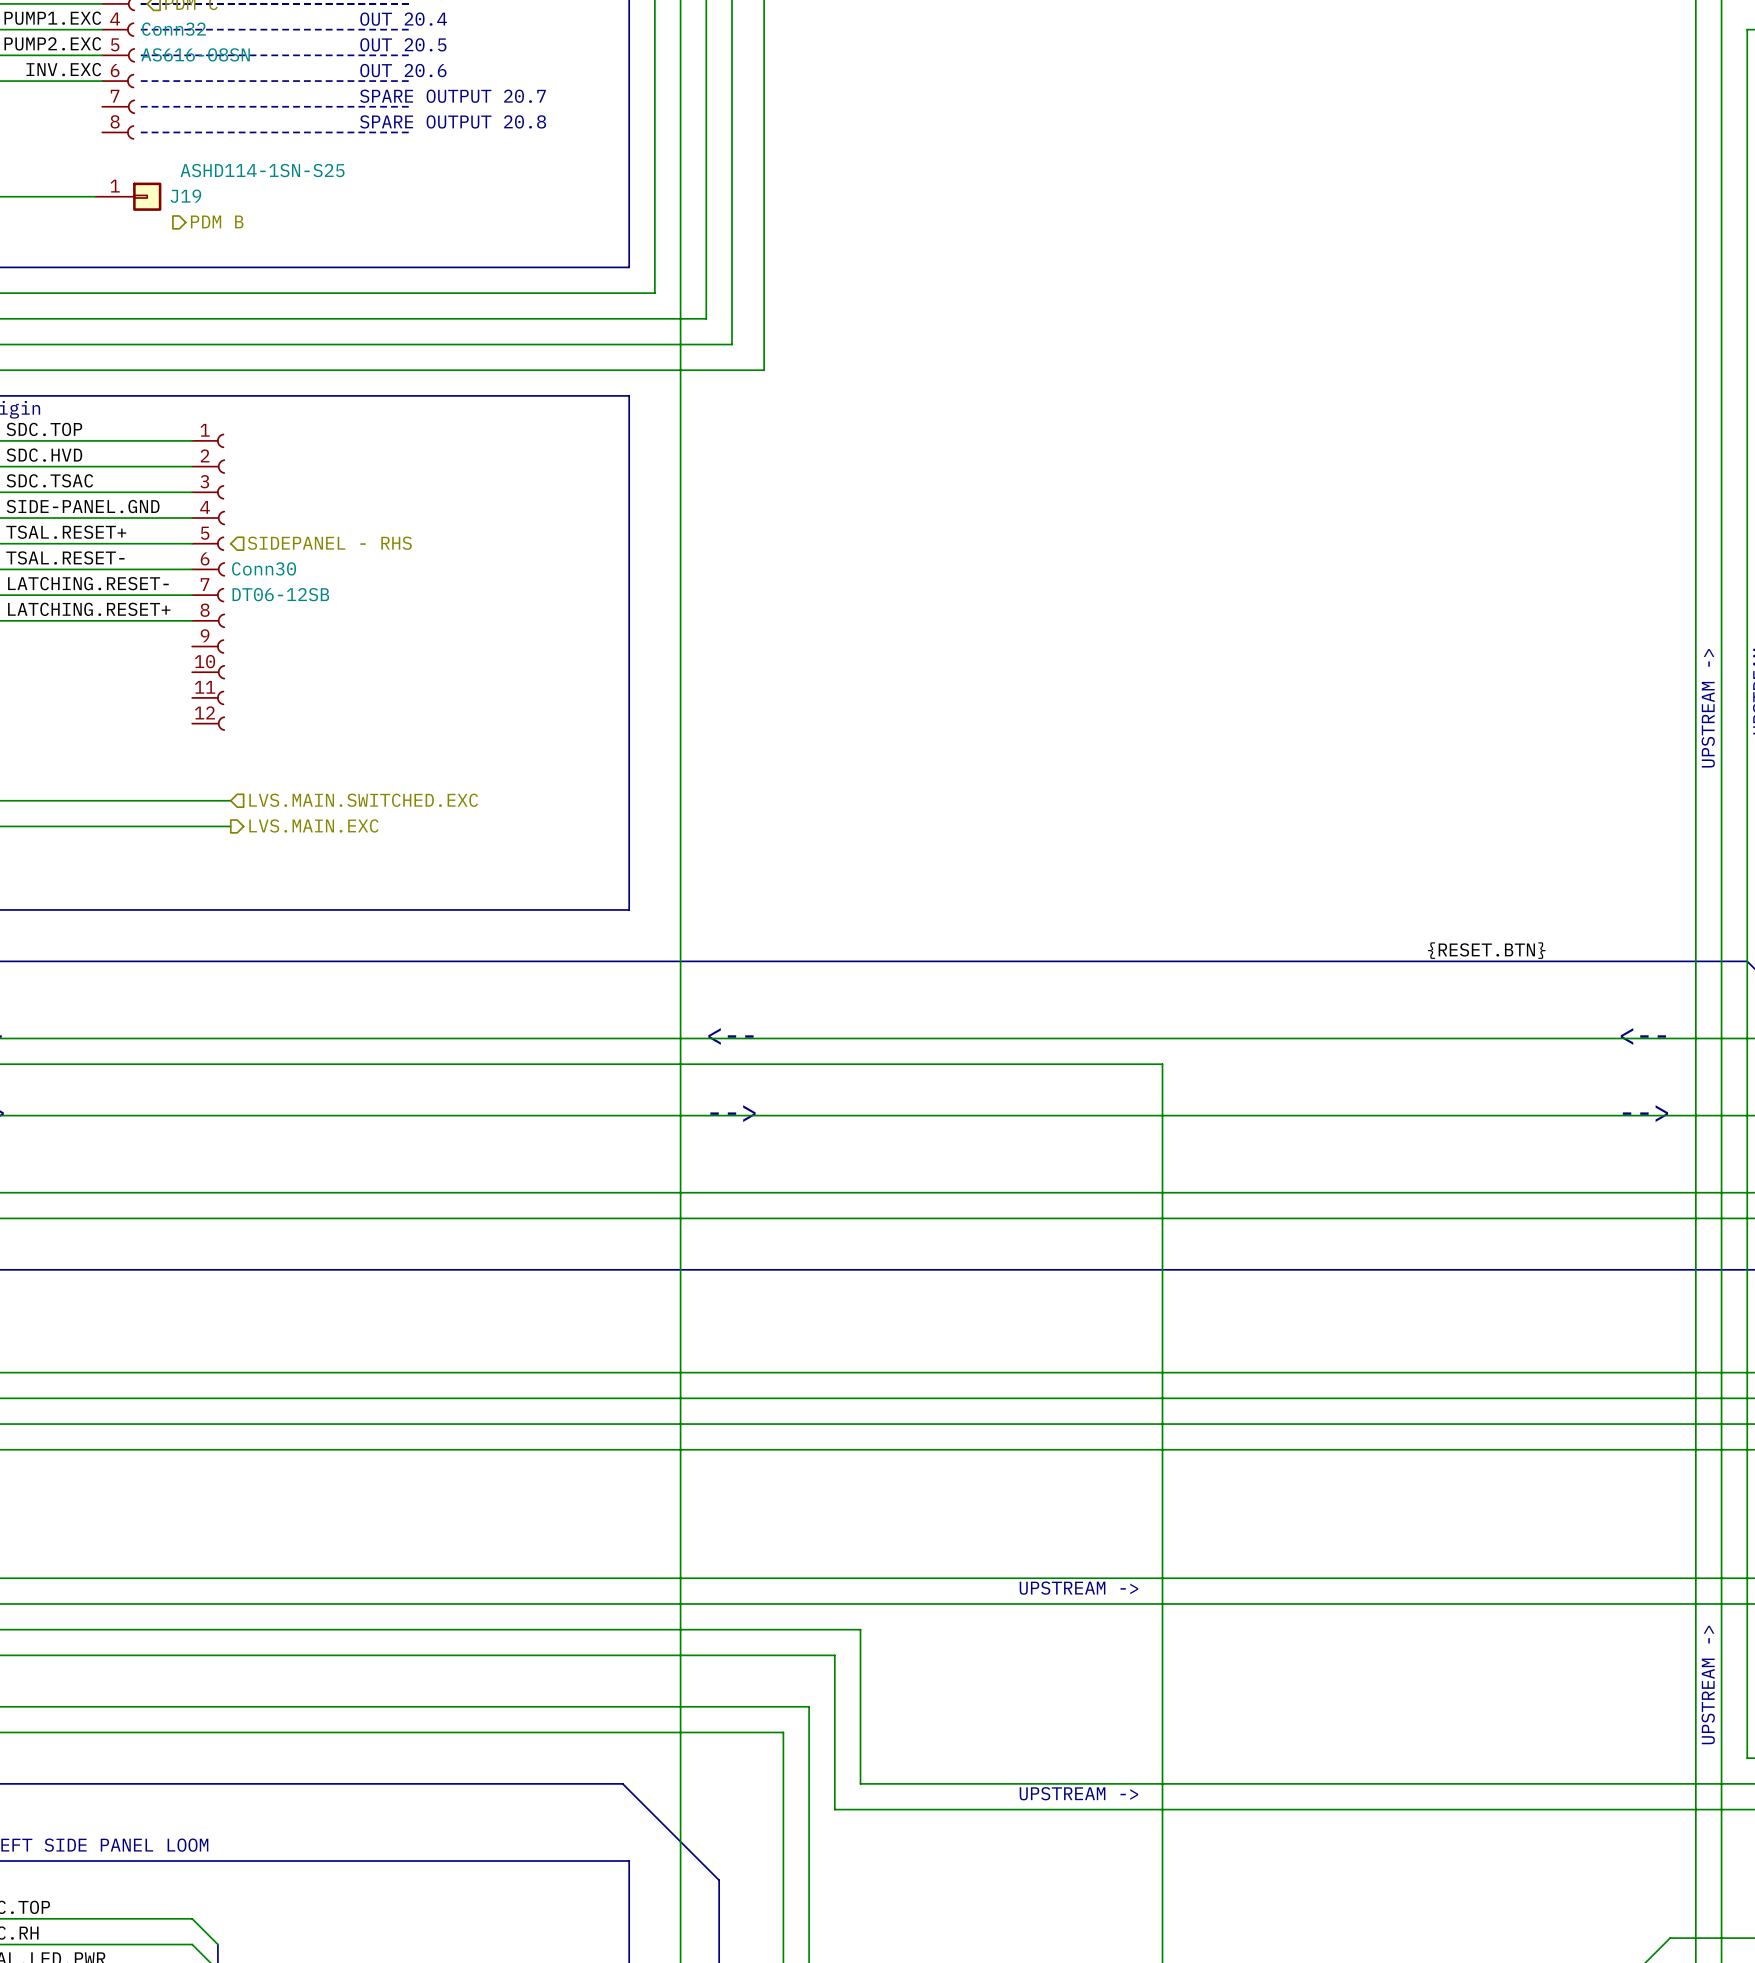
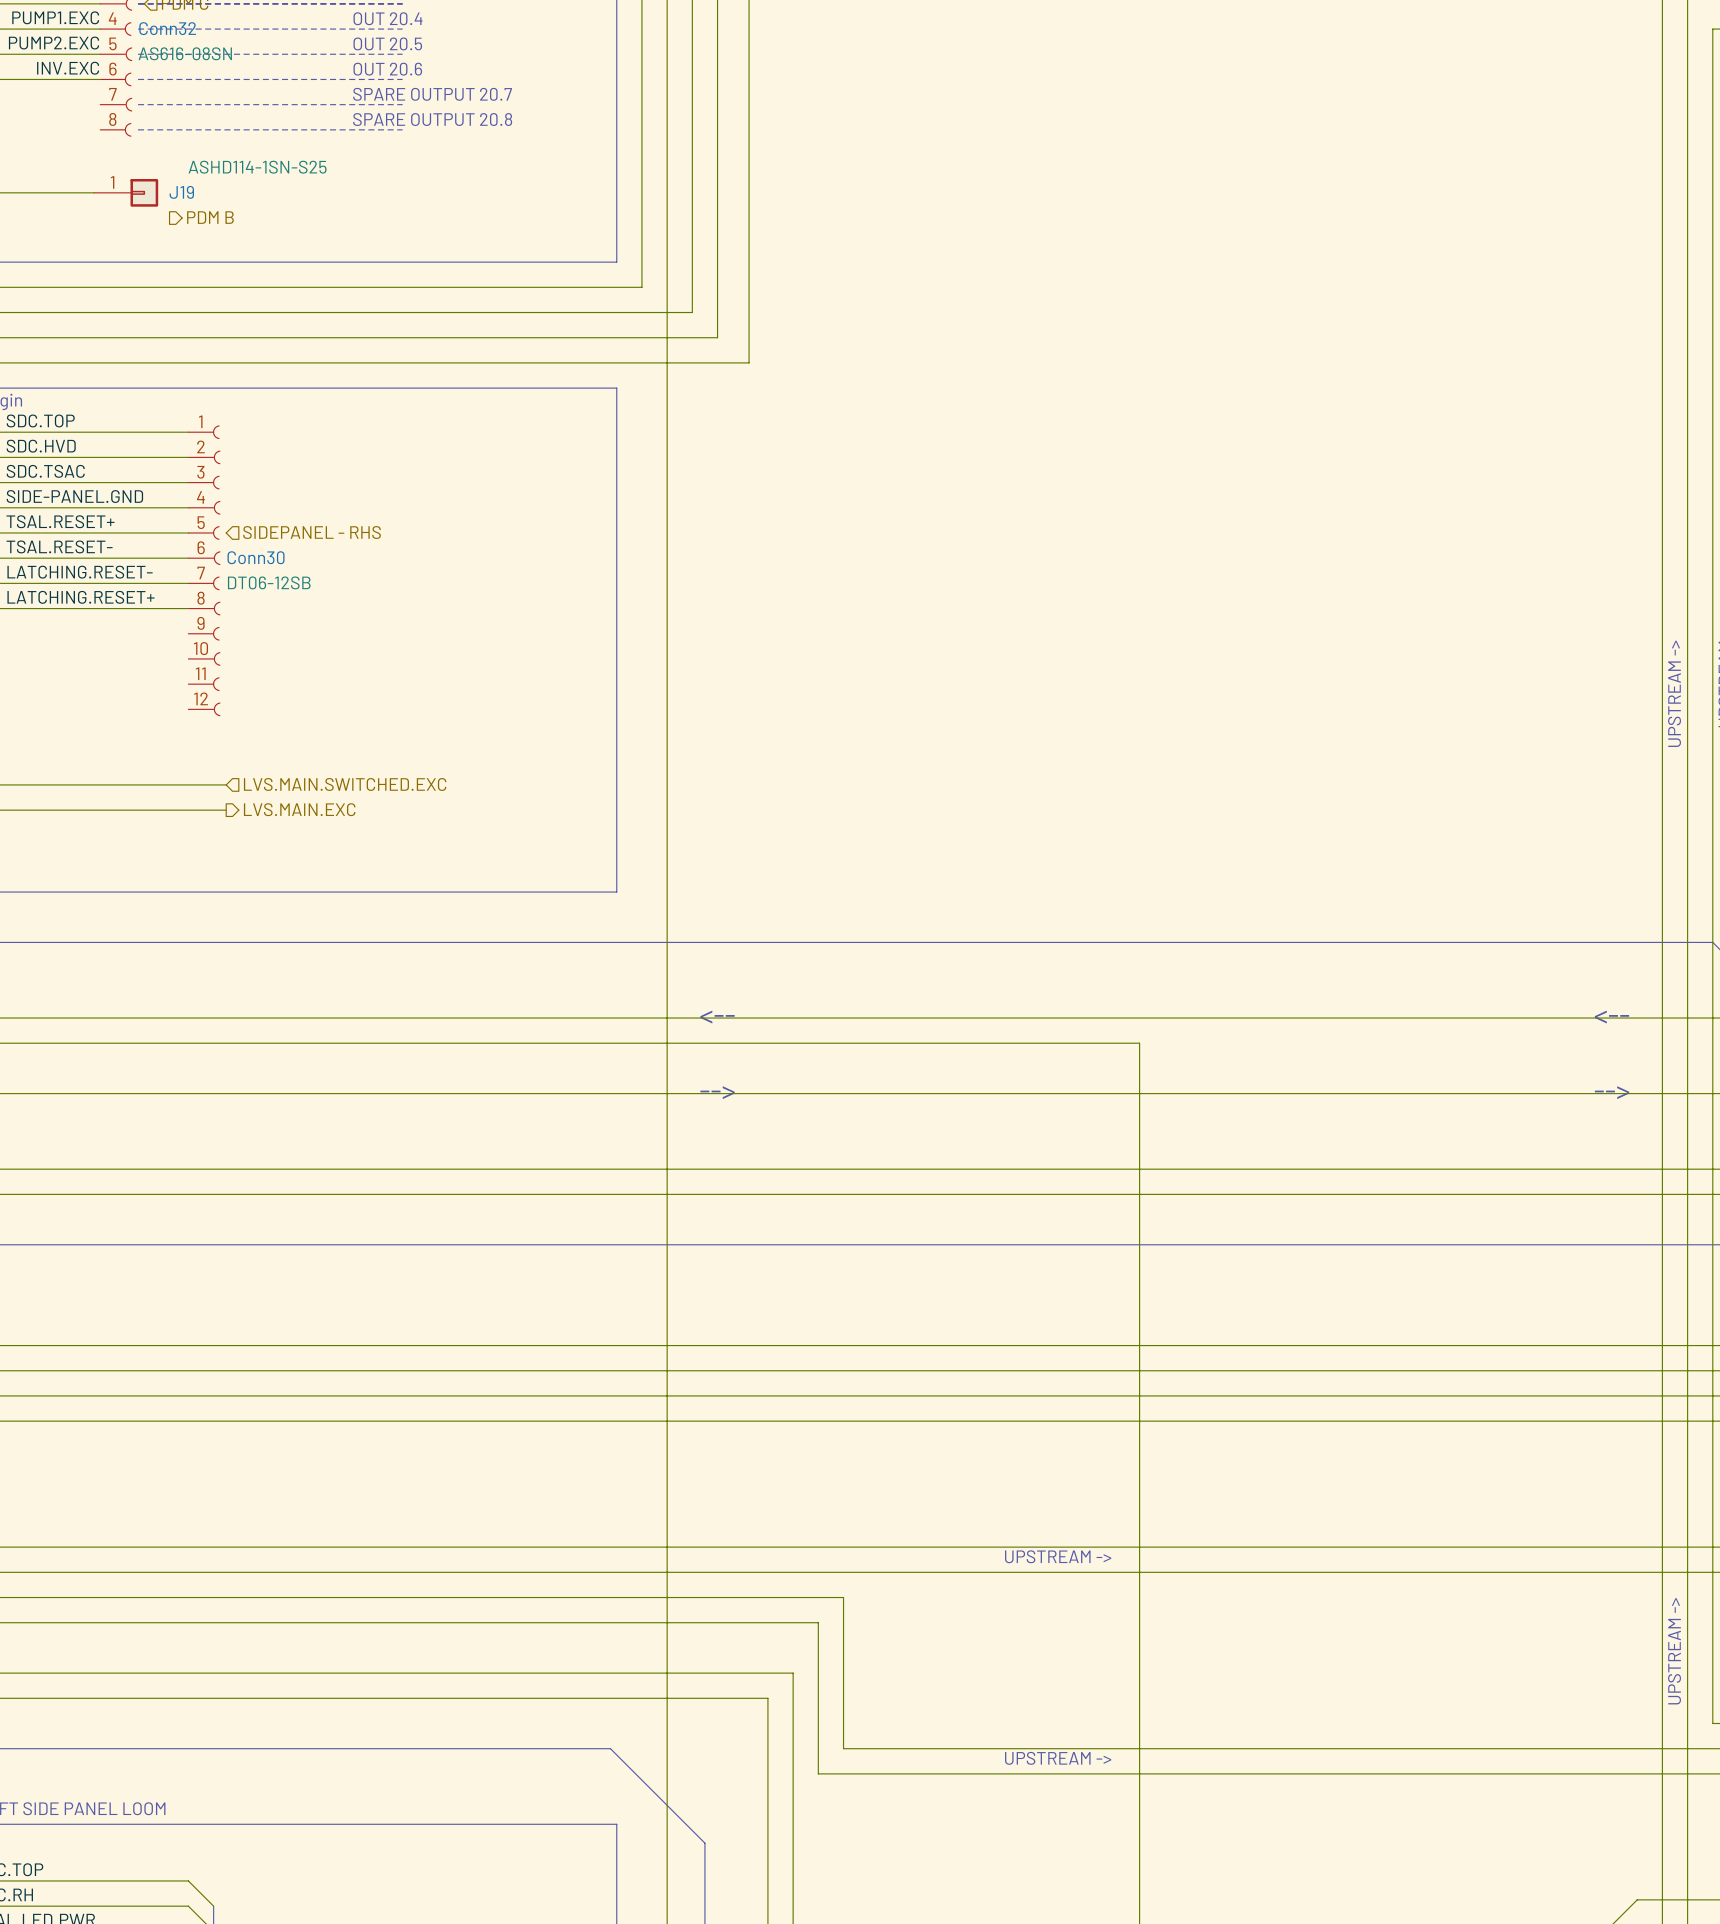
label: {RESET.BTN} (1486, 950) -> none

